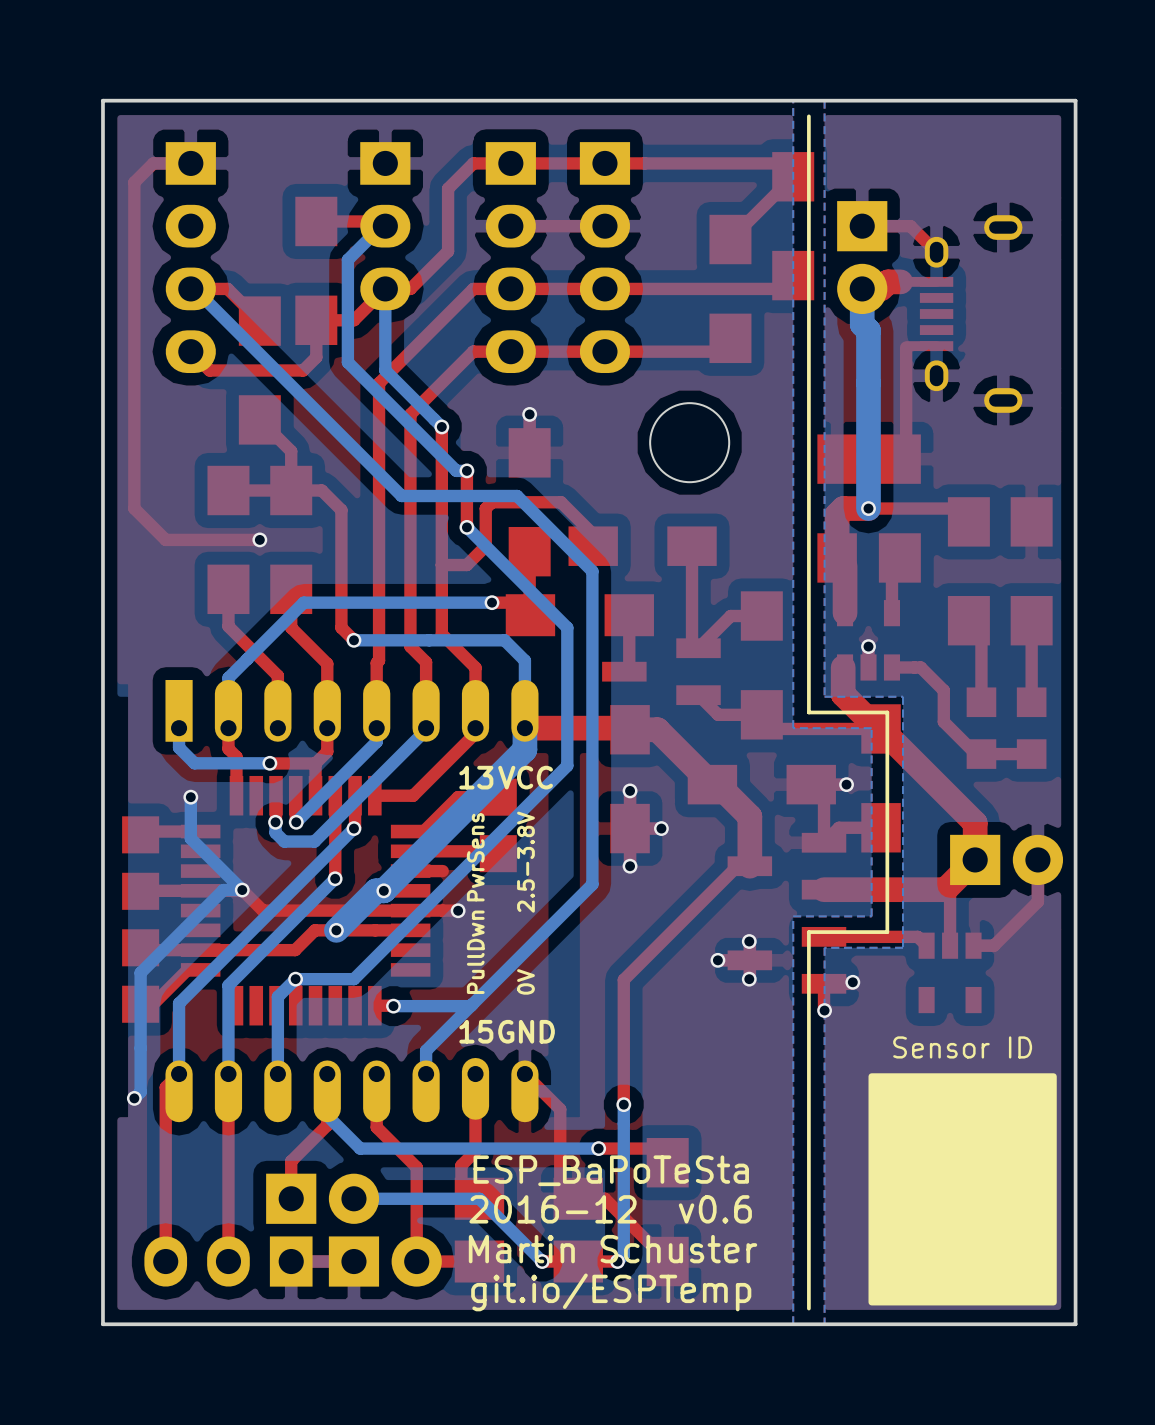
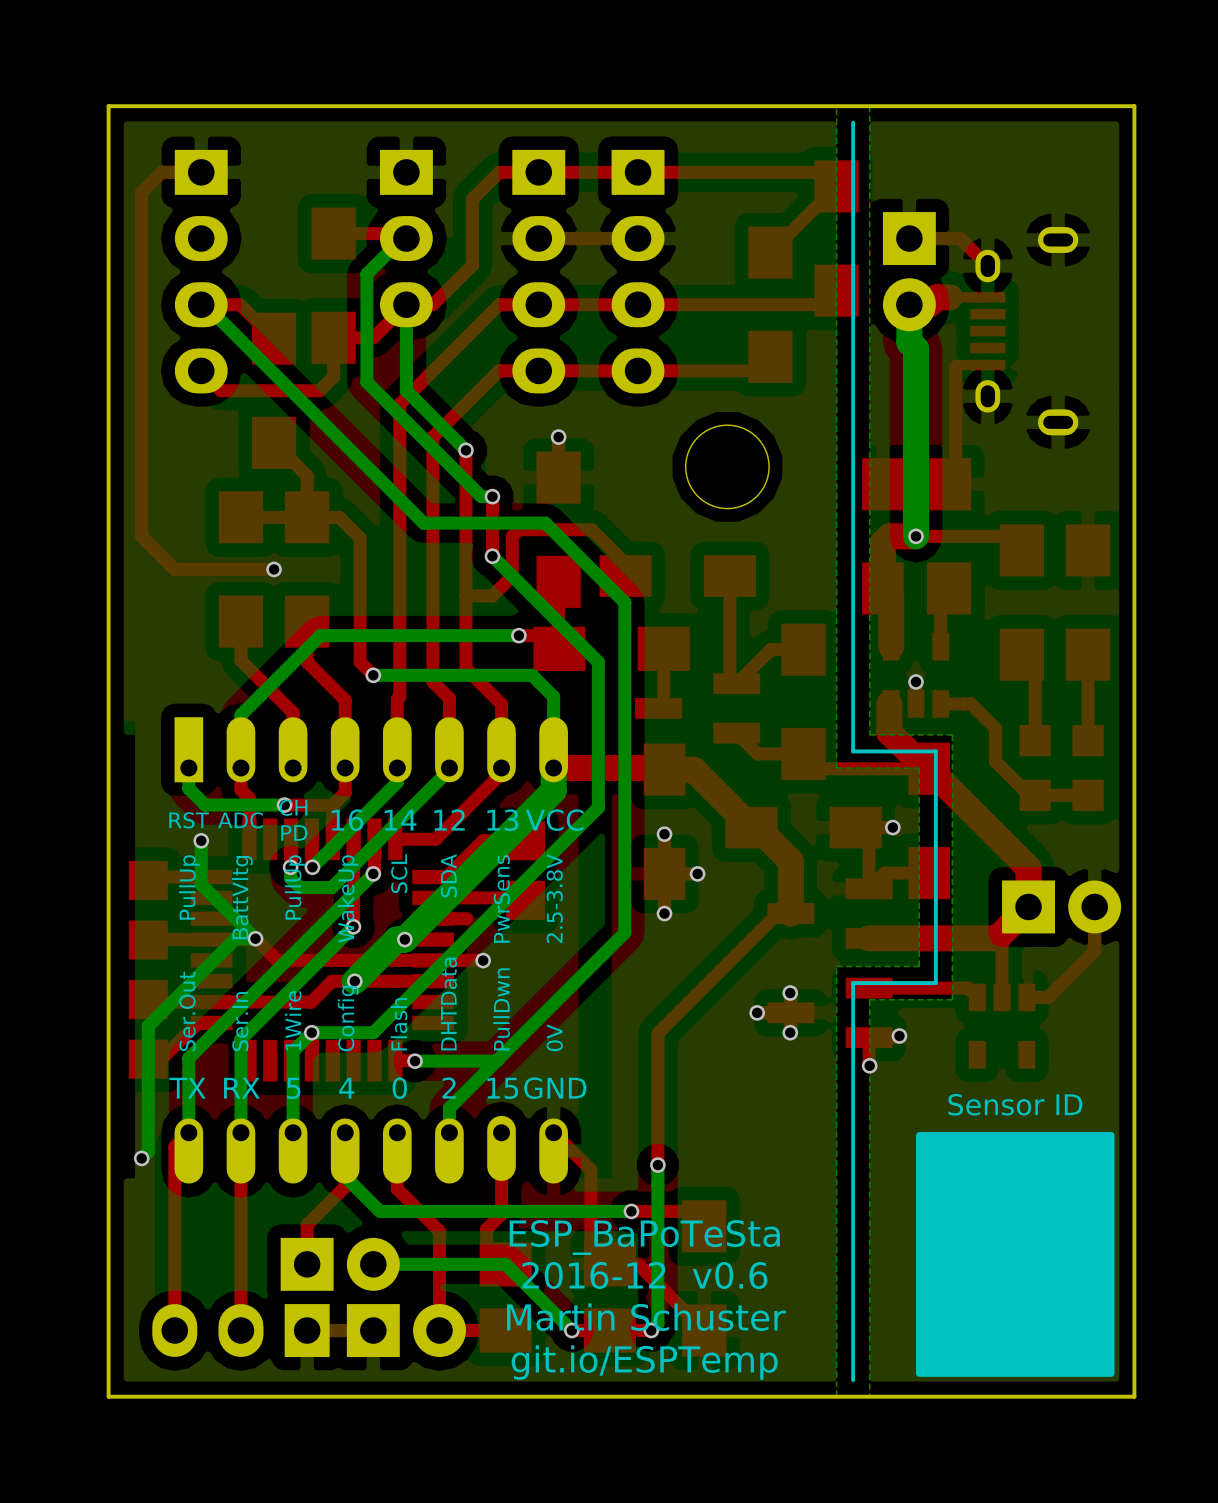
text: none -> CH (293, 807)
text: none -> RST (189, 820)
text: none -> ADC (240, 820)
text: none -> 16 (347, 820)
text: none -> 14 (400, 820)
text: none -> 12 (449, 819)
text: none -> PD (294, 832)
text: none -> SCL (399, 873)
text: none -> SDA (448, 875)
text: none -> PullUp (189, 887)
text: none -> PullUp (295, 887)
text: none -> WakeUp (348, 898)
text: none -> BattVltg (242, 897)
text: none -> DHTData (449, 1004)
text: none -> Ser.Out (187, 1011)
text: none -> Config (348, 1018)
text: none -> Ser.In (240, 1021)
text: none -> 1Wire (293, 1020)
text: none -> Flash (399, 1024)
text: none -> TX (187, 1088)
text: none -> RX (241, 1088)
text: none -> 5 (293, 1088)
text: none -> 4 (346, 1088)
text: none -> 0 (399, 1088)
text: none -> 2 (449, 1088)

